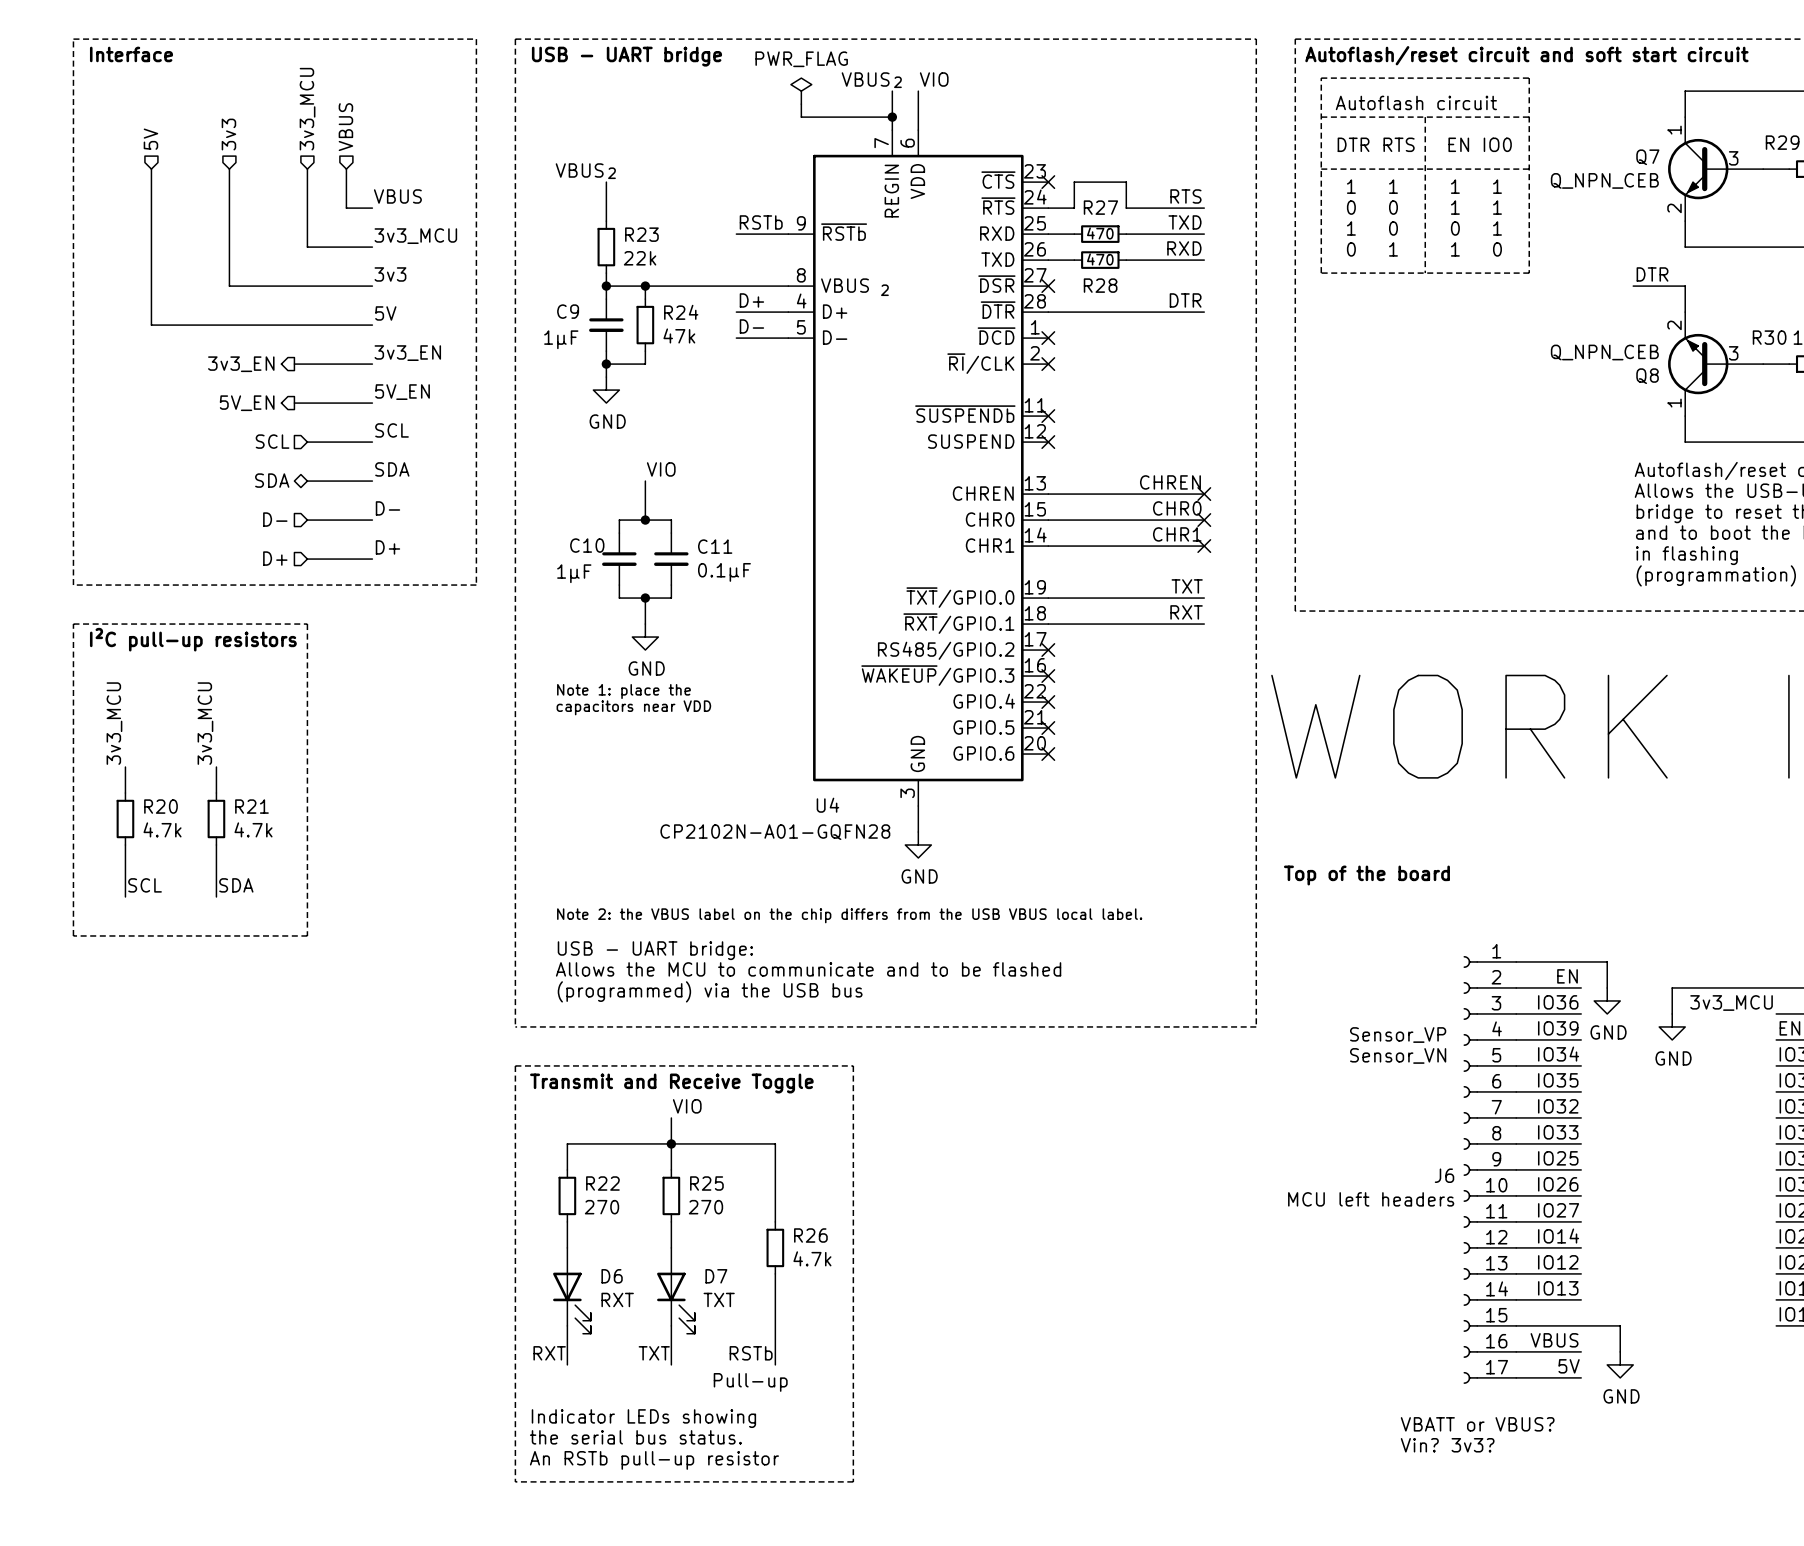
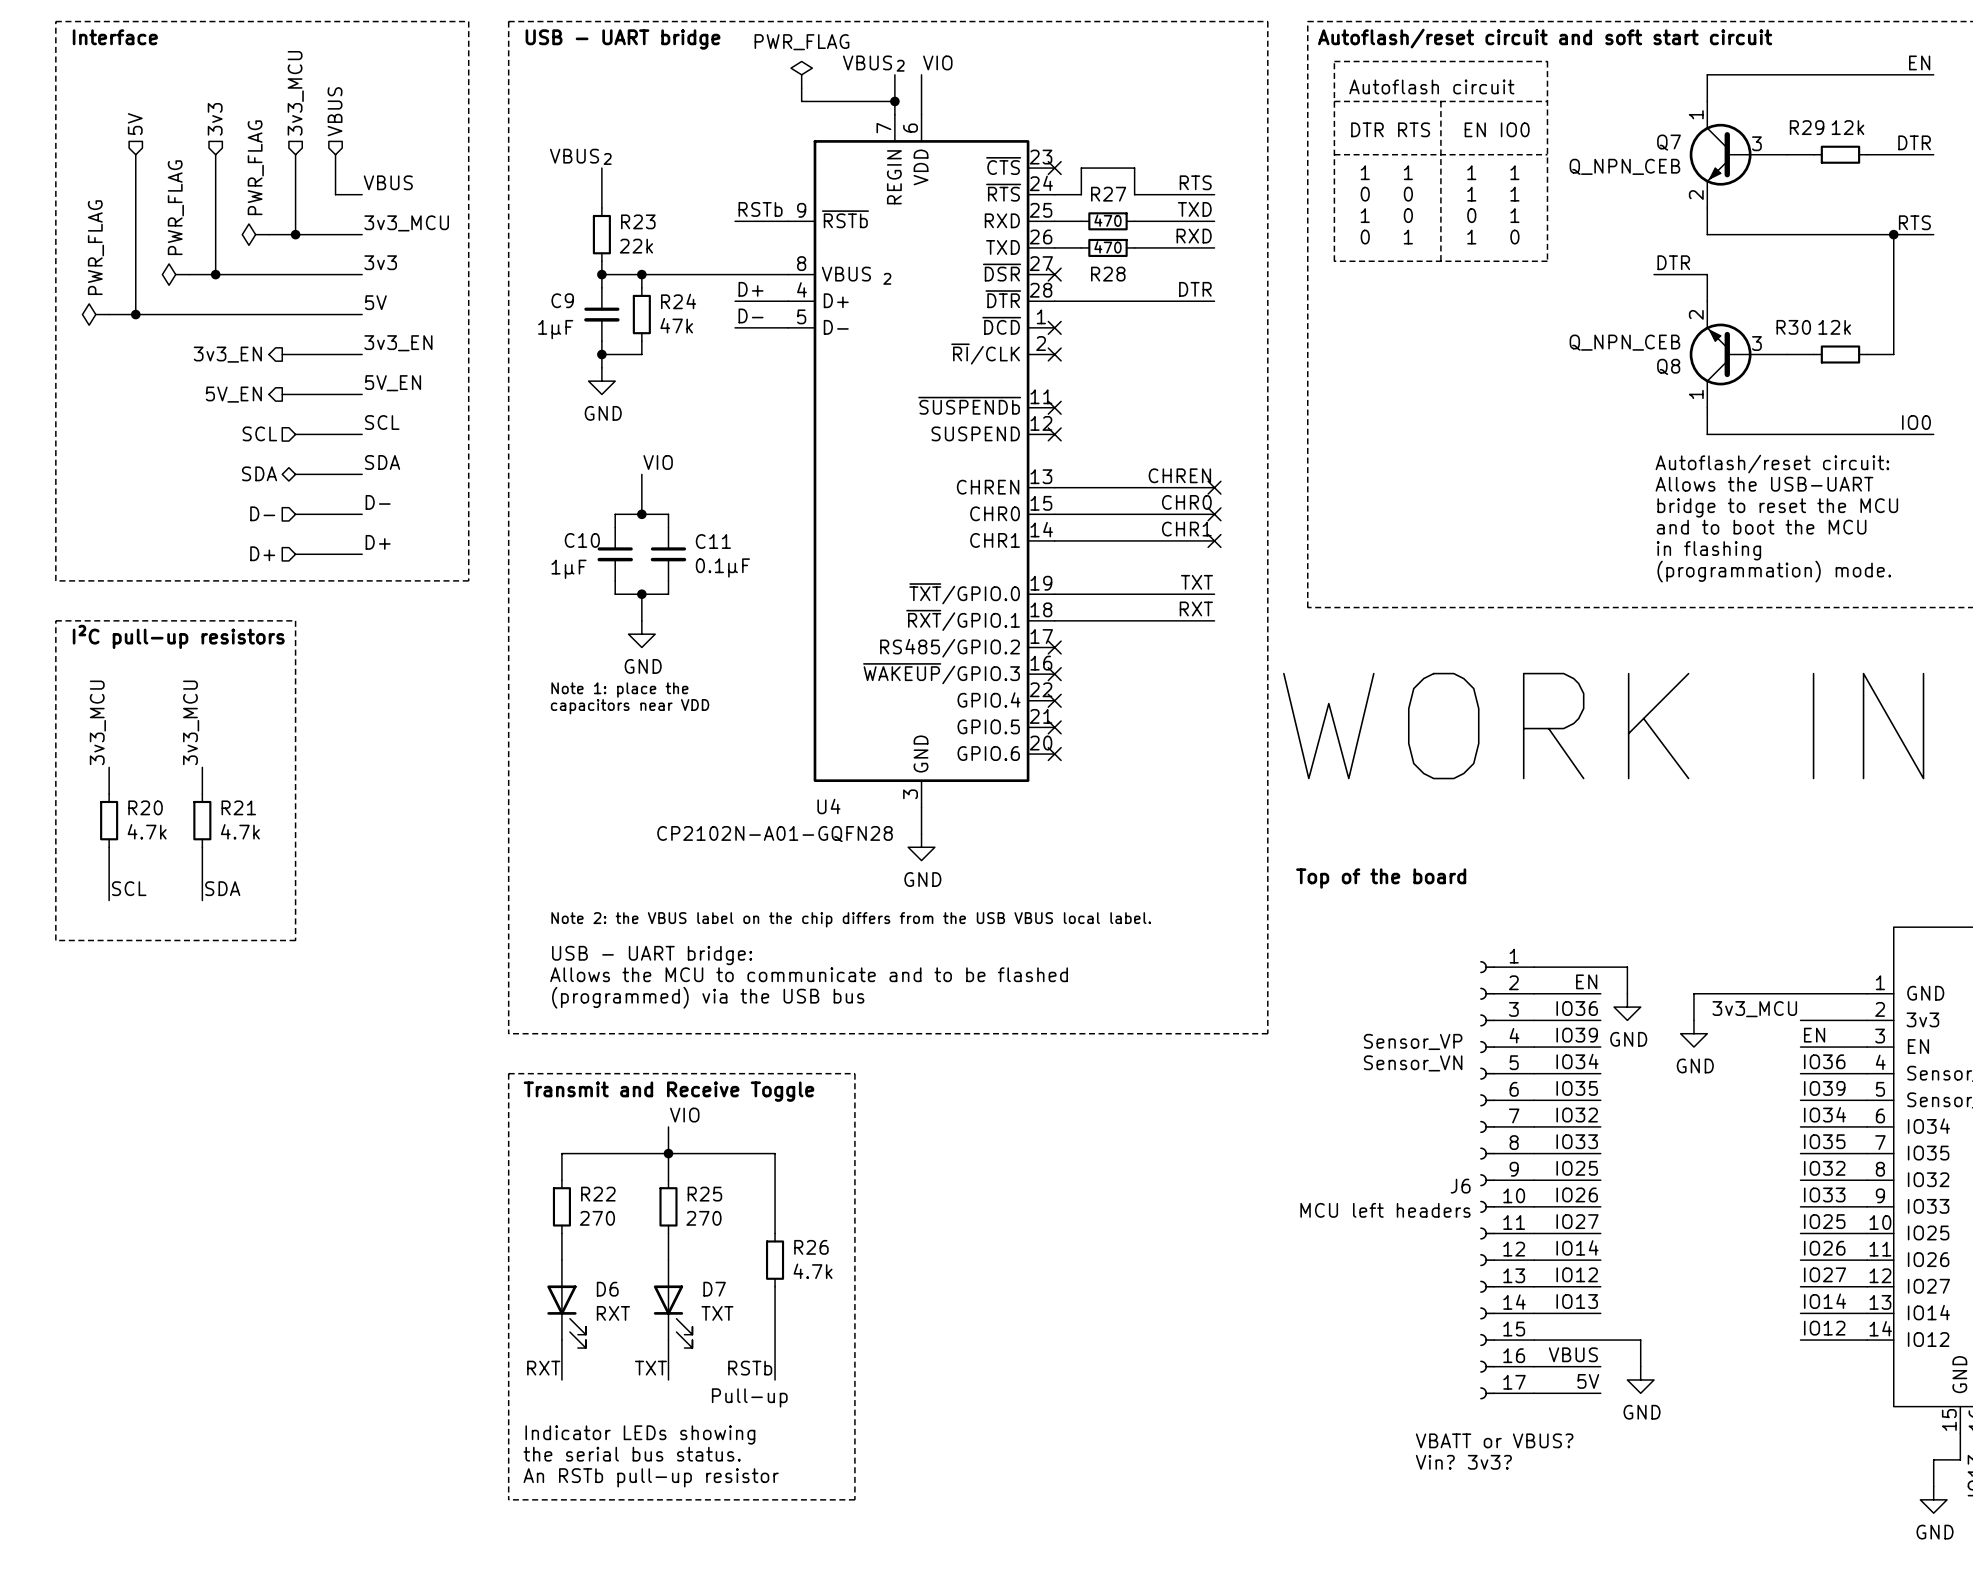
power symbol: none -> PWR_FLAG (255, 234)
wire: none -> (268, 234) (295, 234)
junction: none -> (295, 234)
power symbol: none -> PWR_FLAG (175, 274)
wire: none -> (189, 274) (215, 274)
junction: none -> (215, 274)
power symbol: none -> PWR_FLAG (95, 314)
wire: none -> (109, 314) (135, 314)
junction: none -> (135, 314)

